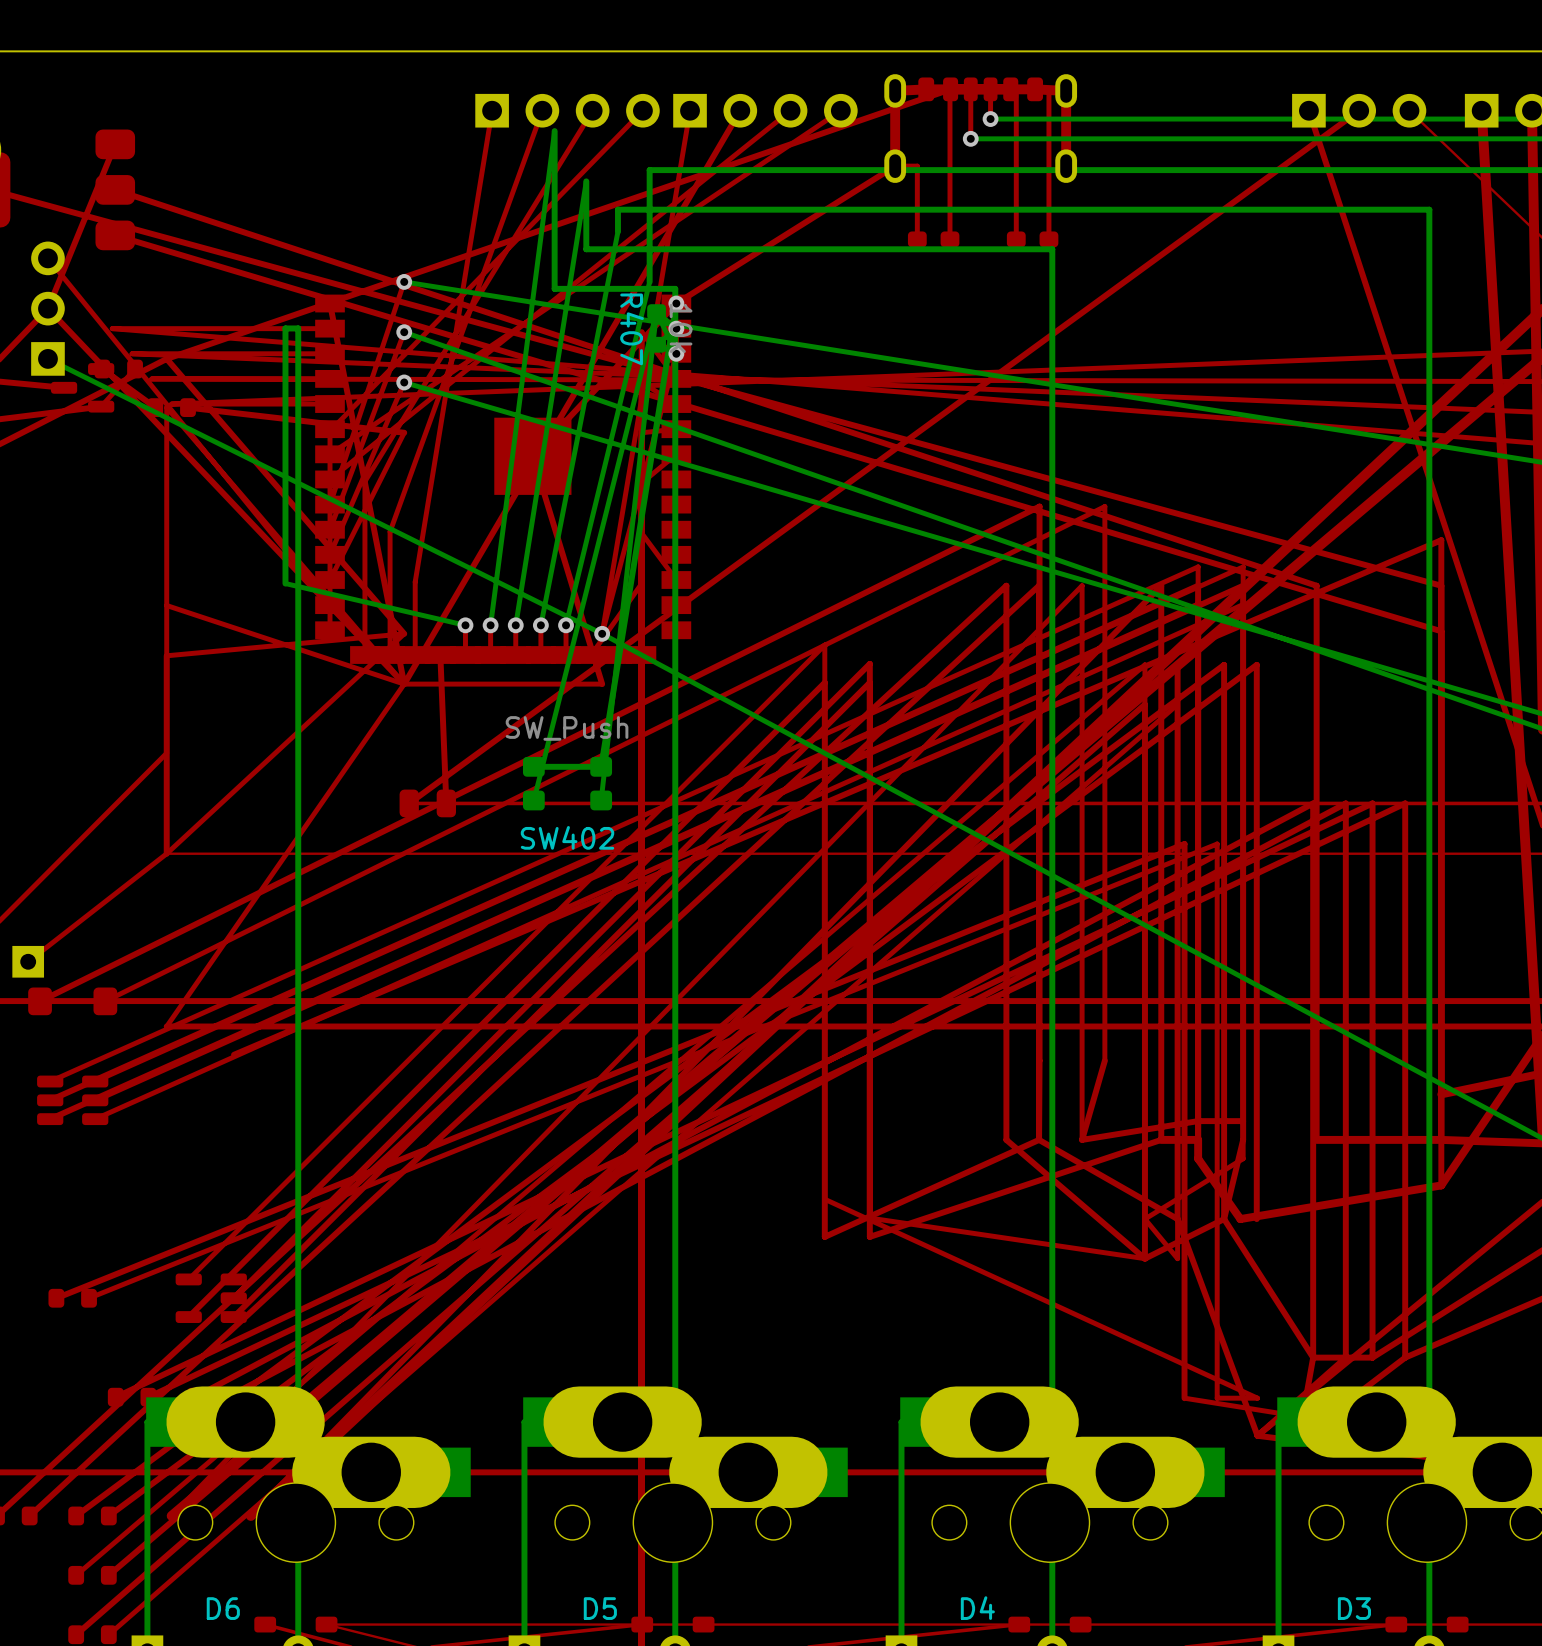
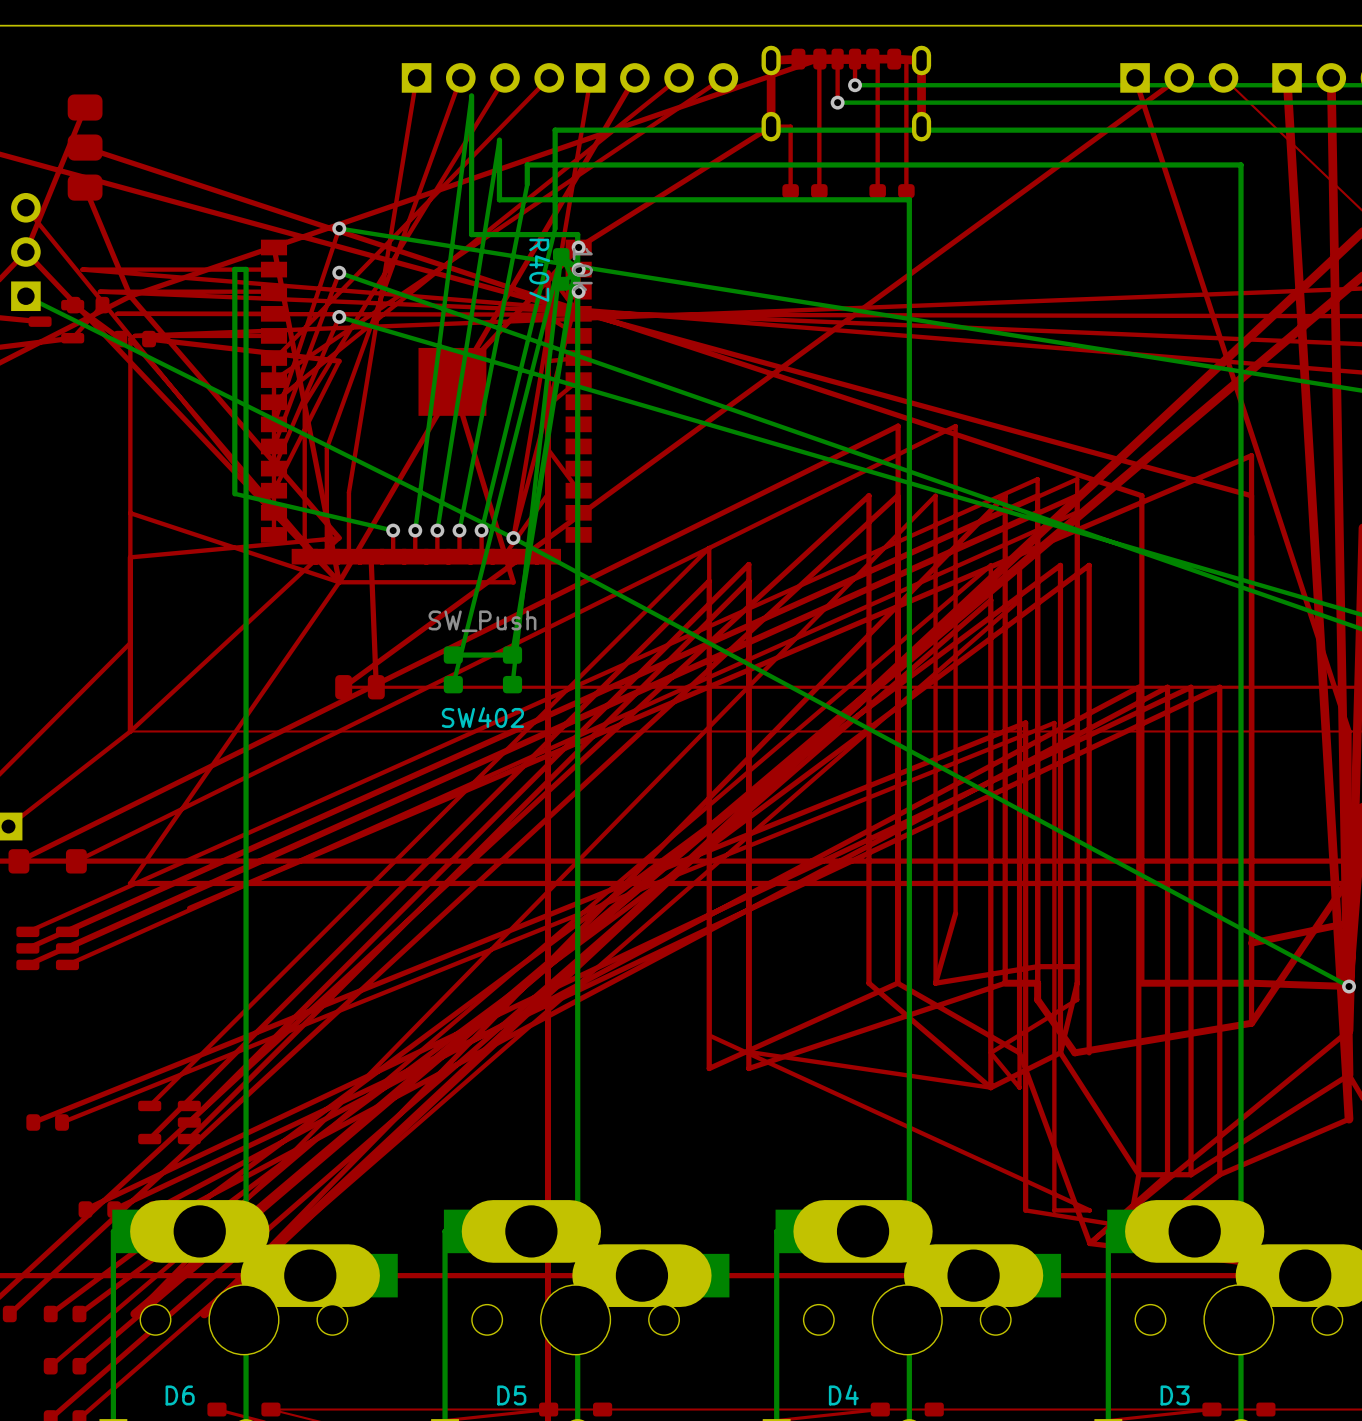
top track: (115, 235) (1441, 631) -> (85, 187) (130, 296)

